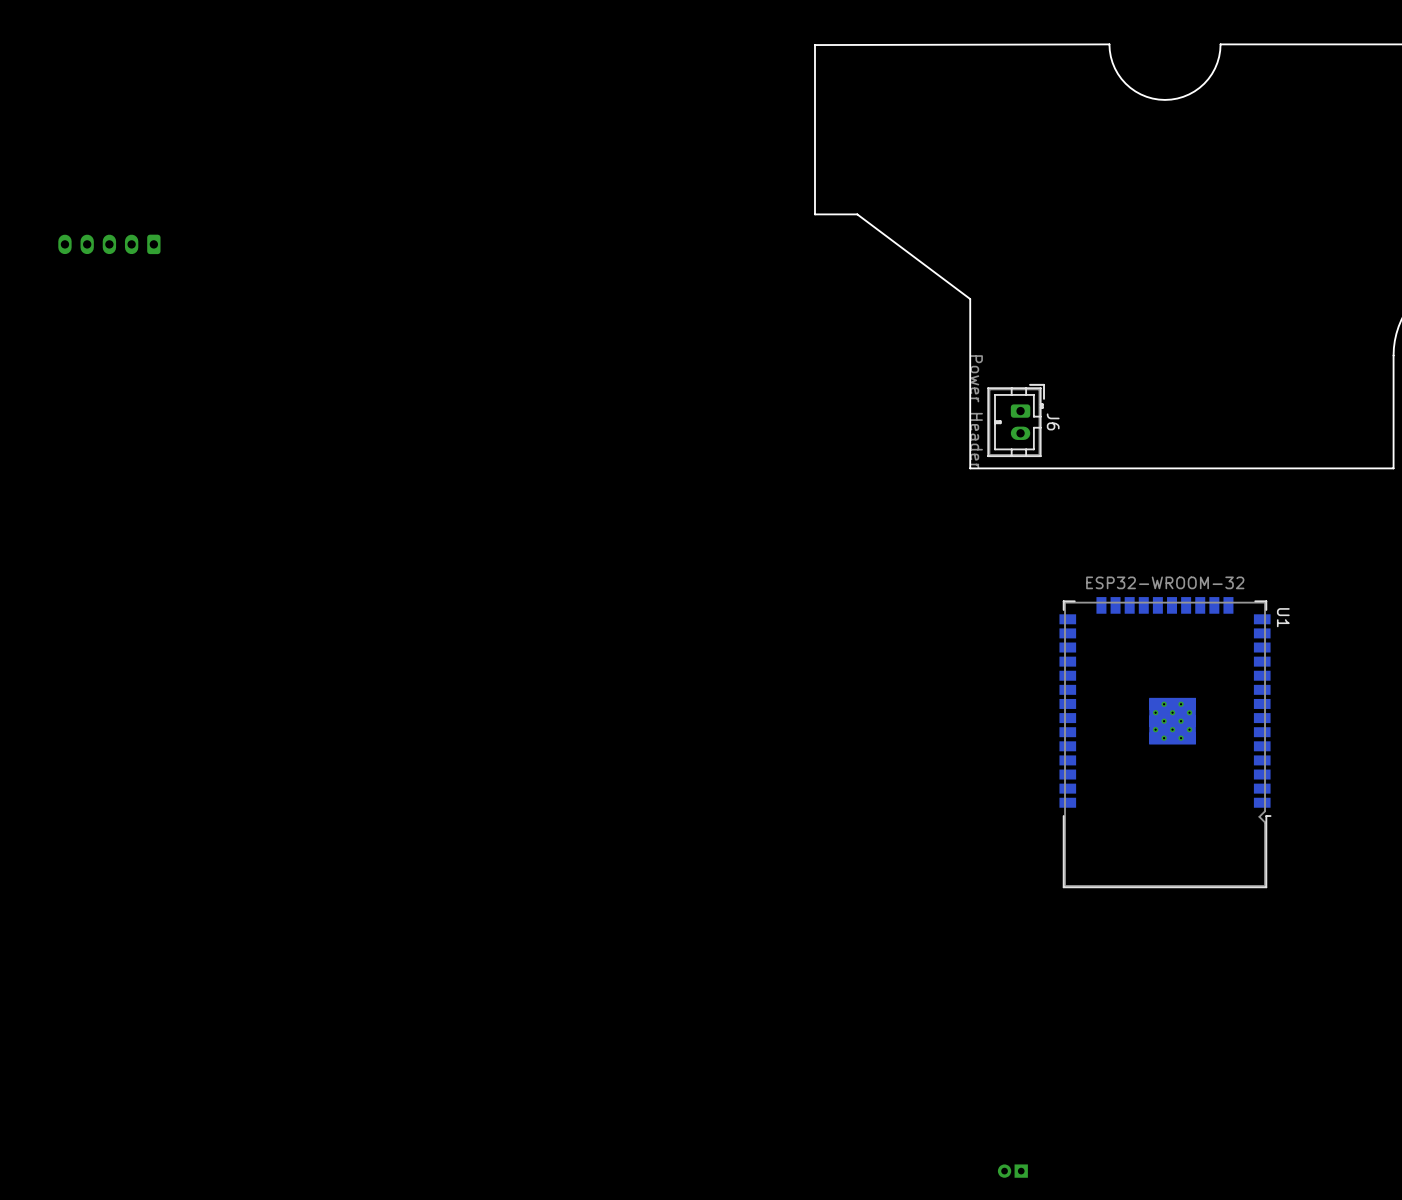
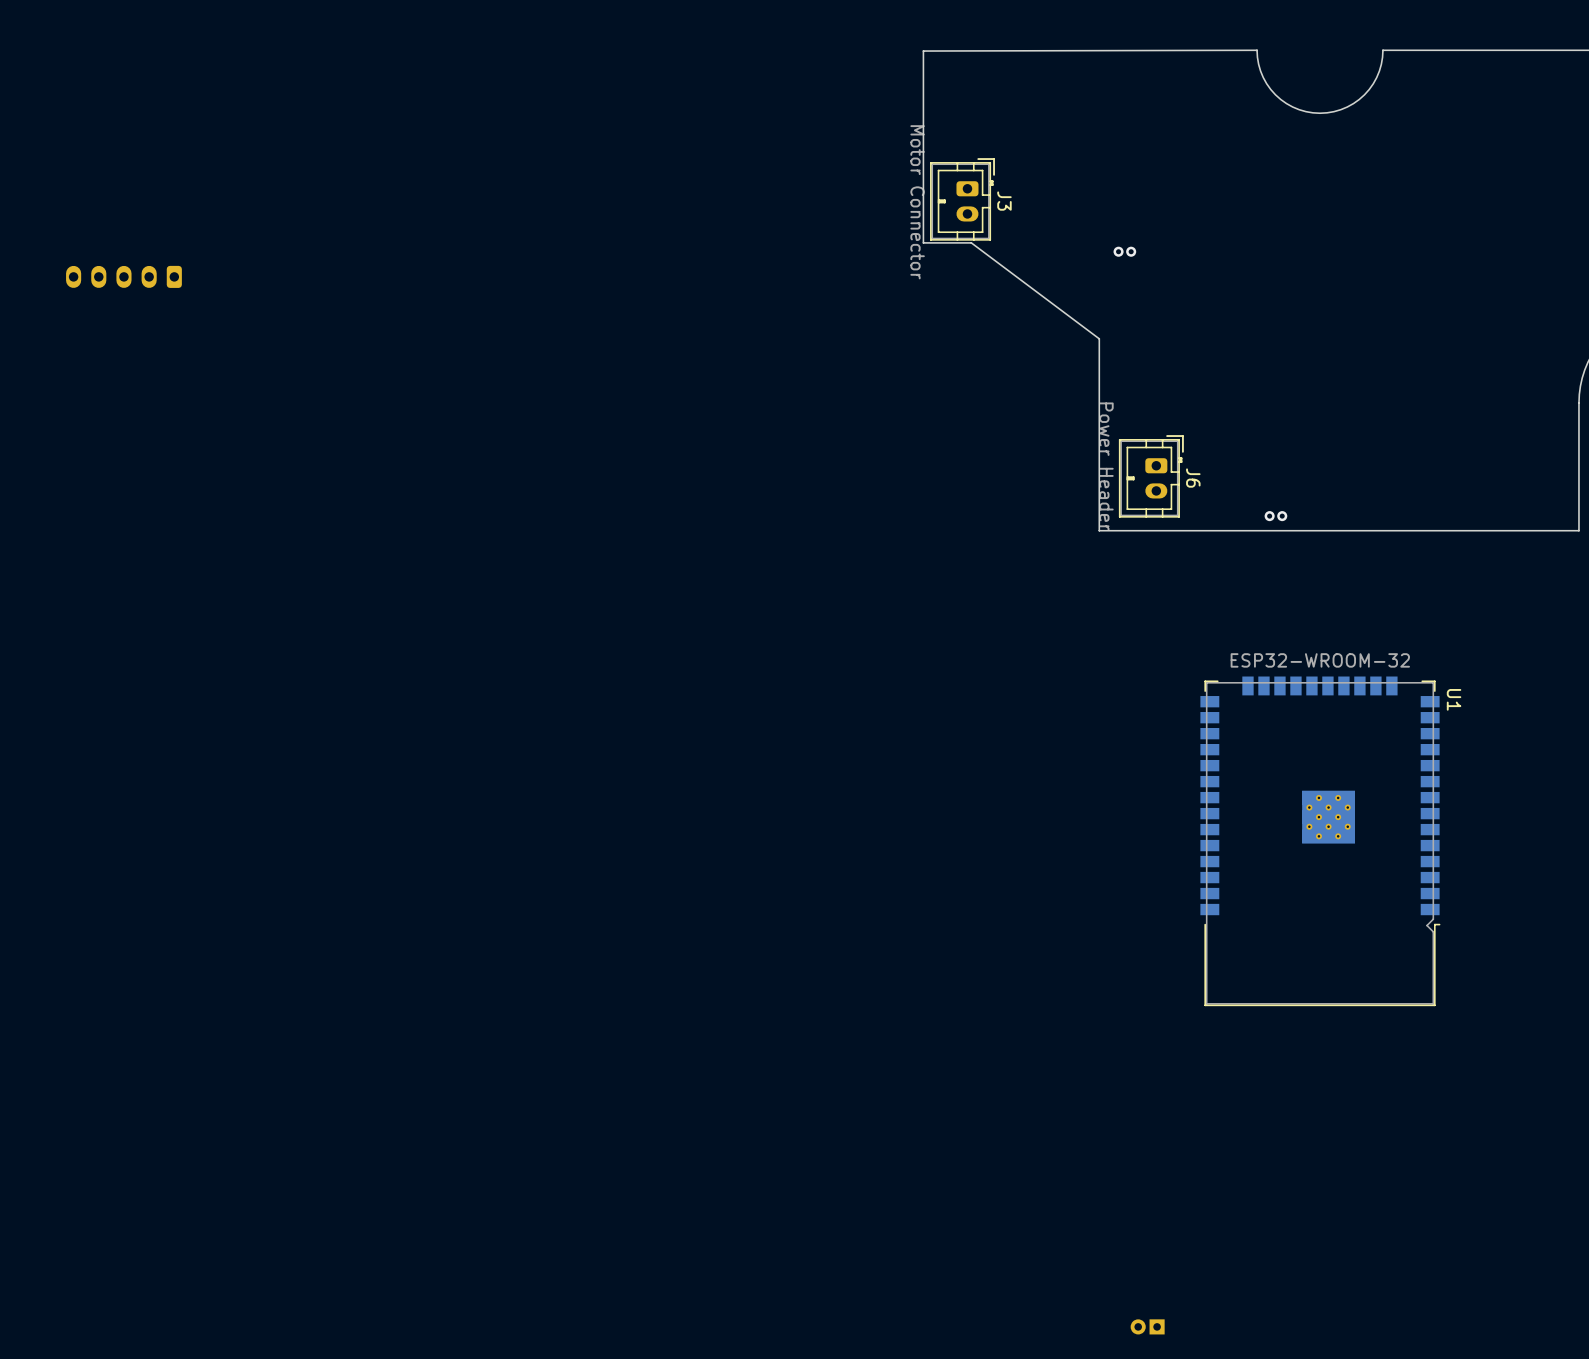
J3: none -> Motor Connector (962, 199)
via: none -> (1118, 251)
via: none -> (1131, 251)
via: none -> (1269, 516)
via: none -> (1282, 516)

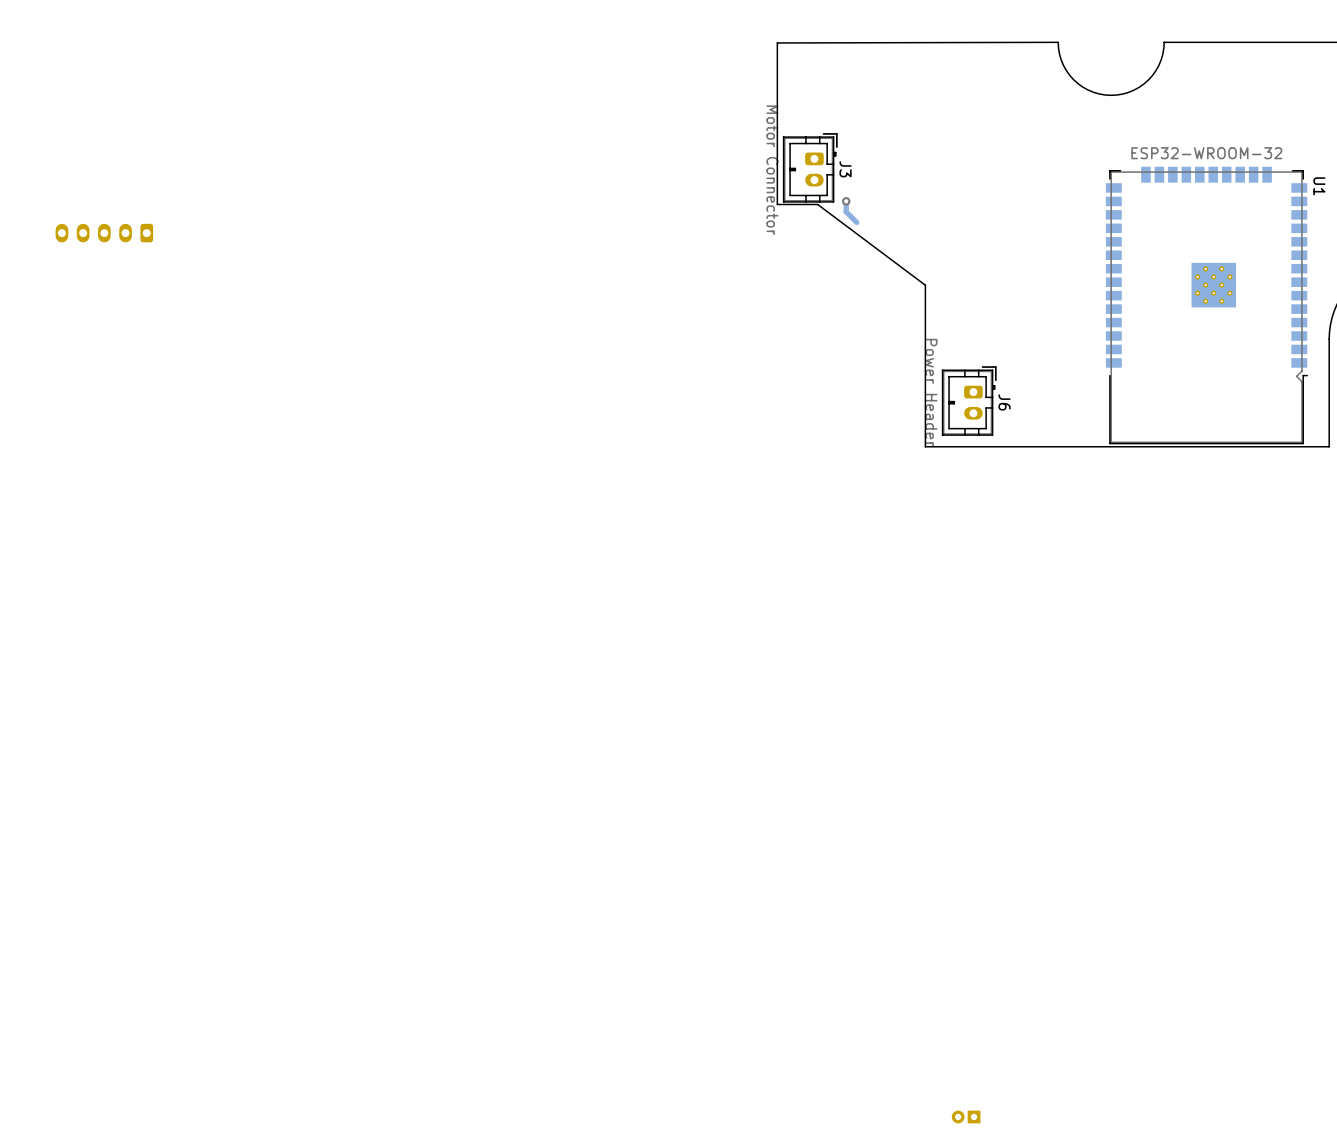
track: none -> (846, 201) (846, 211) (856, 222)
via: none -> (846, 201)
via: (1118, 251) -> none
via: (1131, 251) -> none
via: (1269, 516) -> none
via: (1282, 516) -> none
U1 position: (1320, 841) -> (1206, 305)

